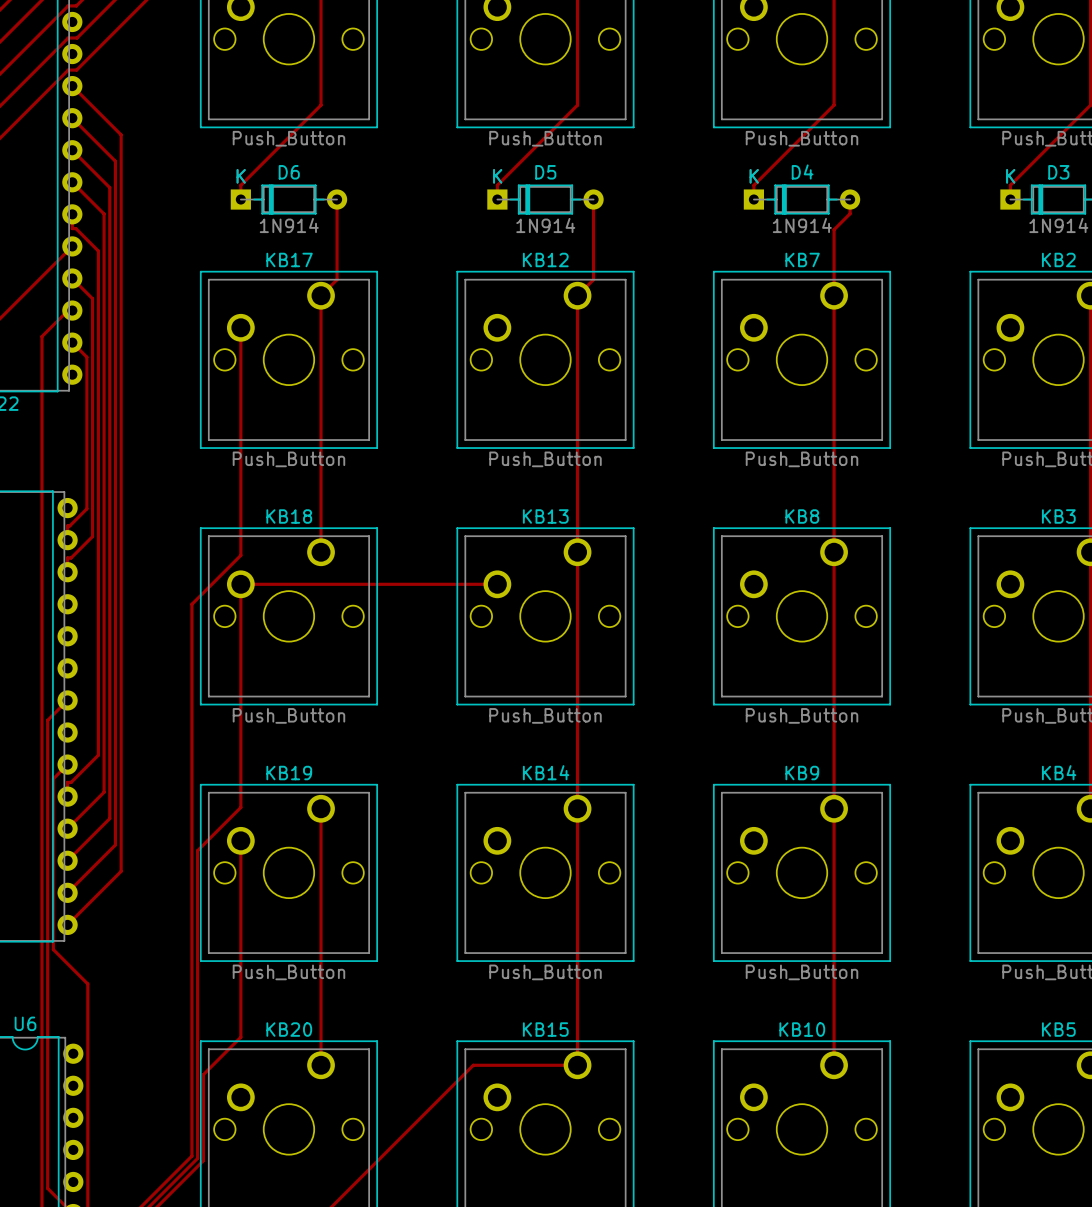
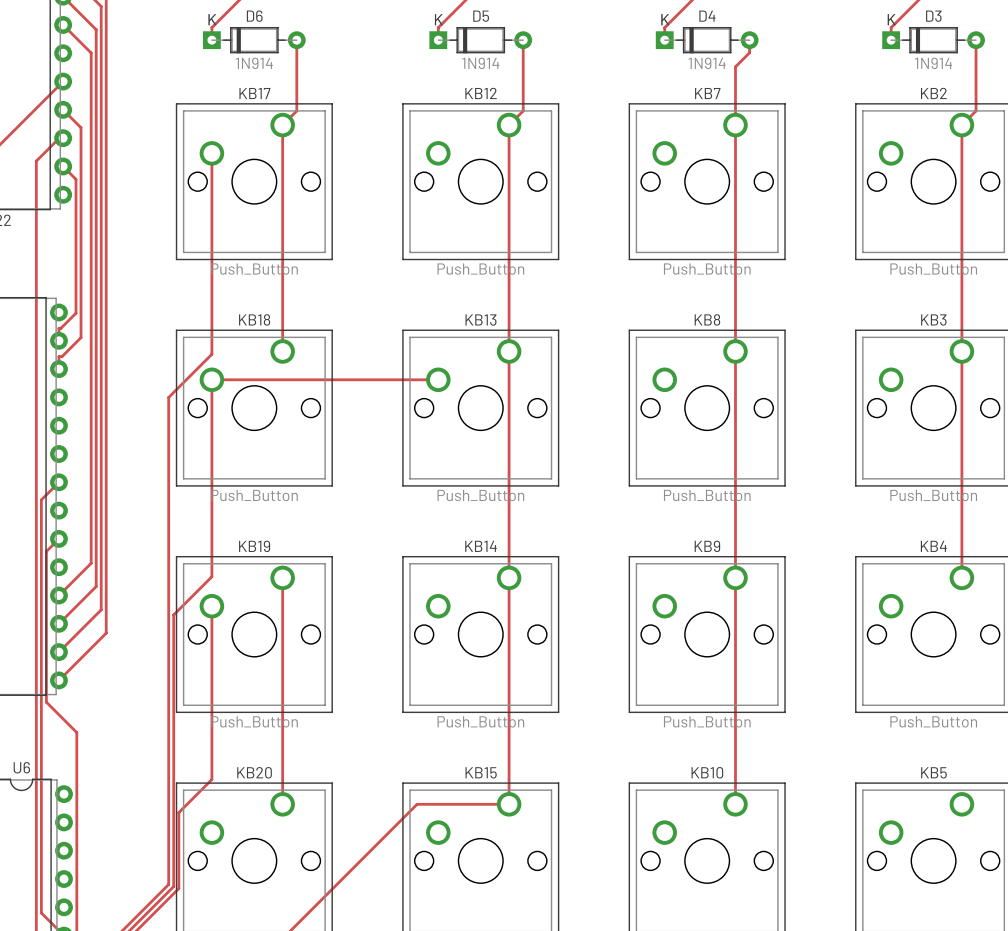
track: (72, 214) (72, 228) (75, 228) (98, 251) (98, 755) (71, 782) (67, 782) (67, 796) -> none

